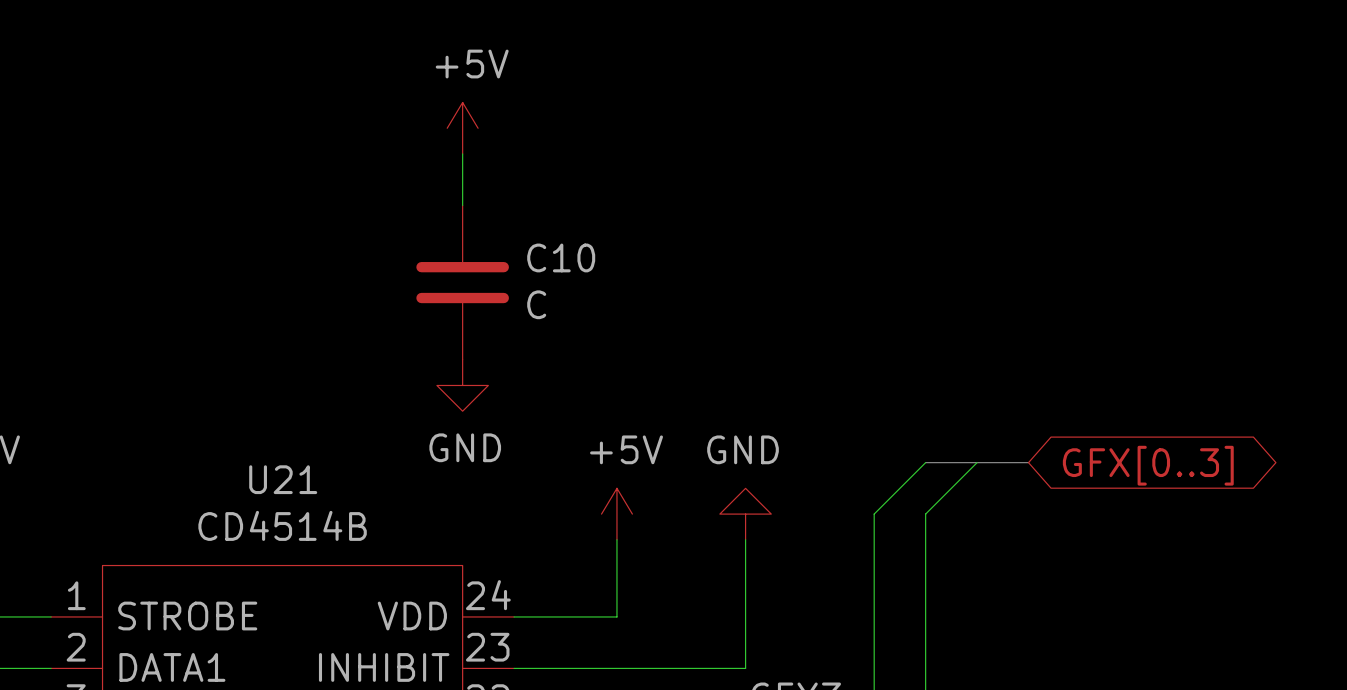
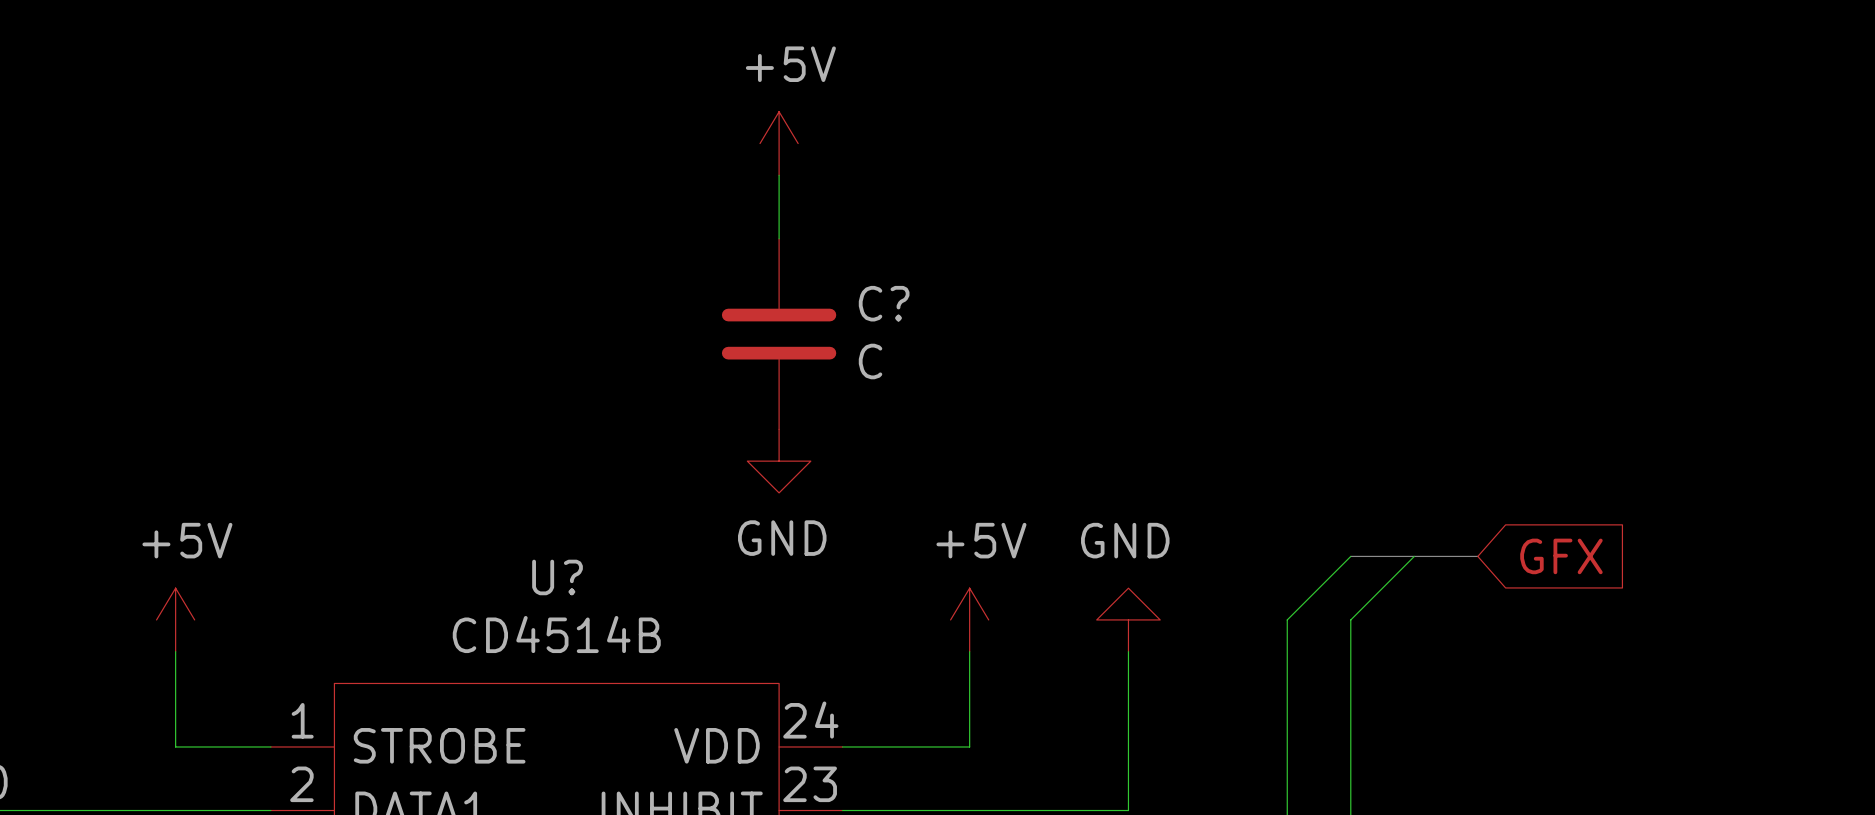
C10 name: C10 (561, 257) -> C? (884, 303)
global label shape: bidirectional (1148, 465) -> input (1561, 556)
global label: GFX[0..3] (1148, 465) -> GFX (1561, 556)
U21 name: U21 (283, 479) -> U? (557, 577)

